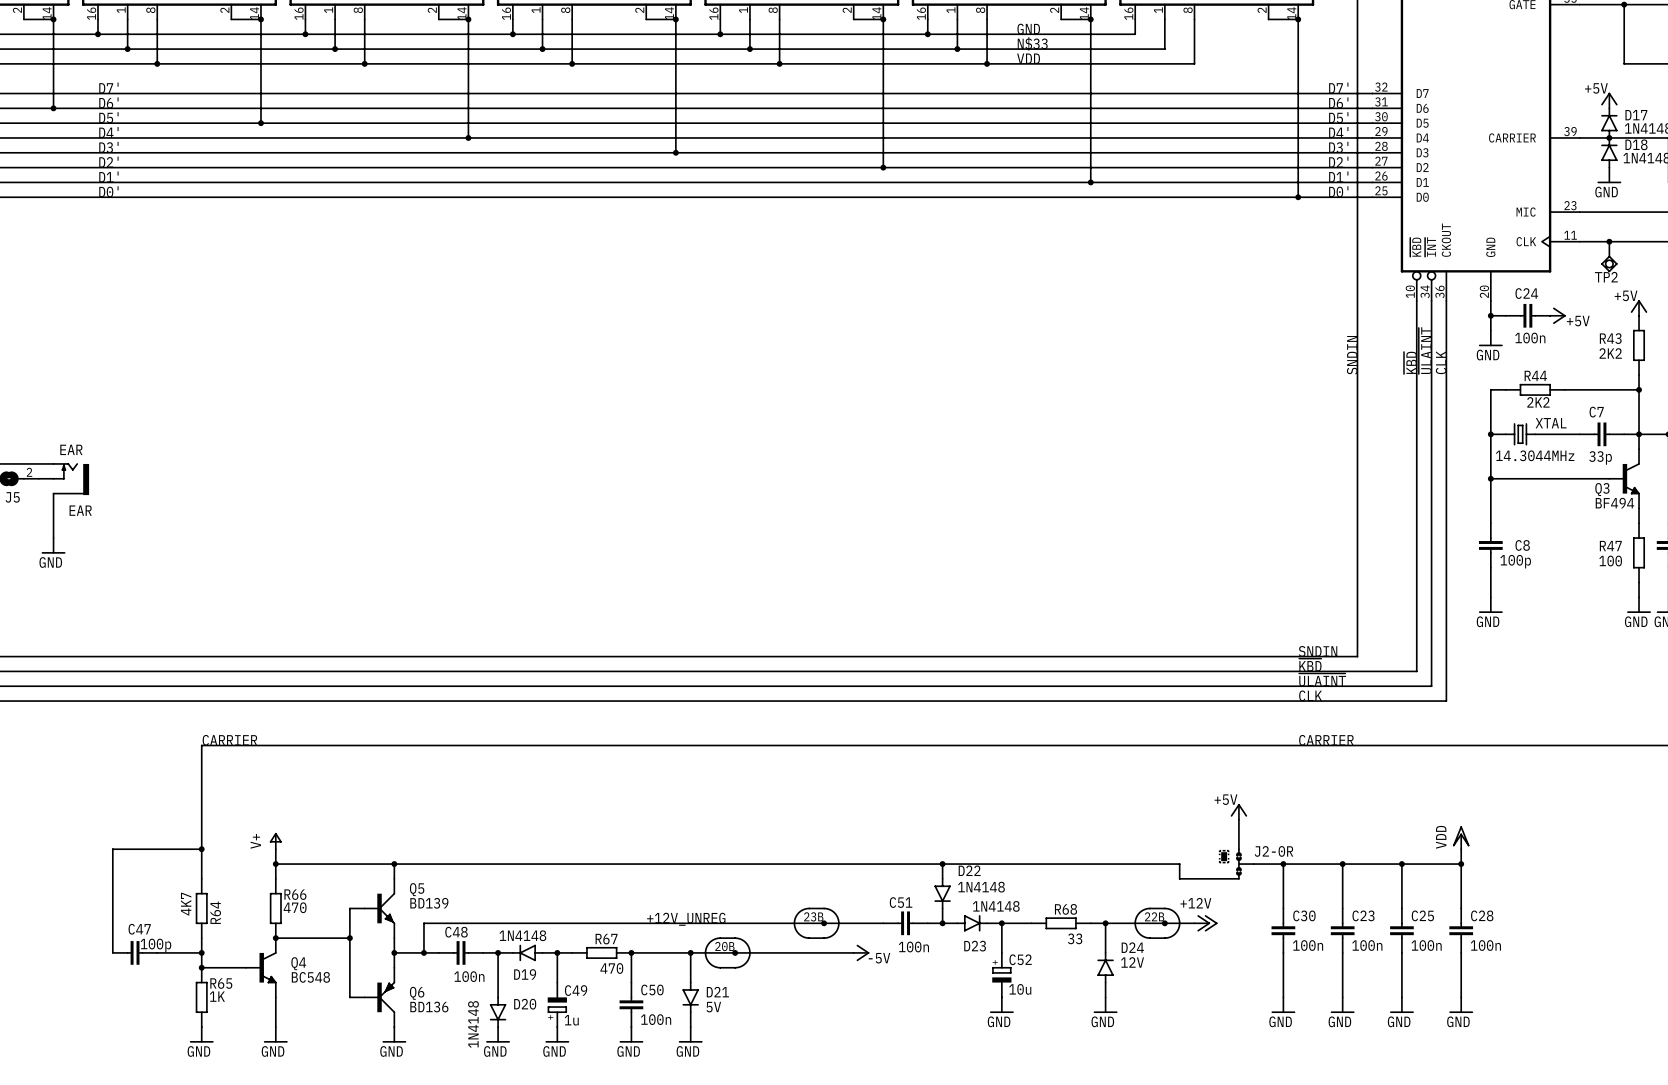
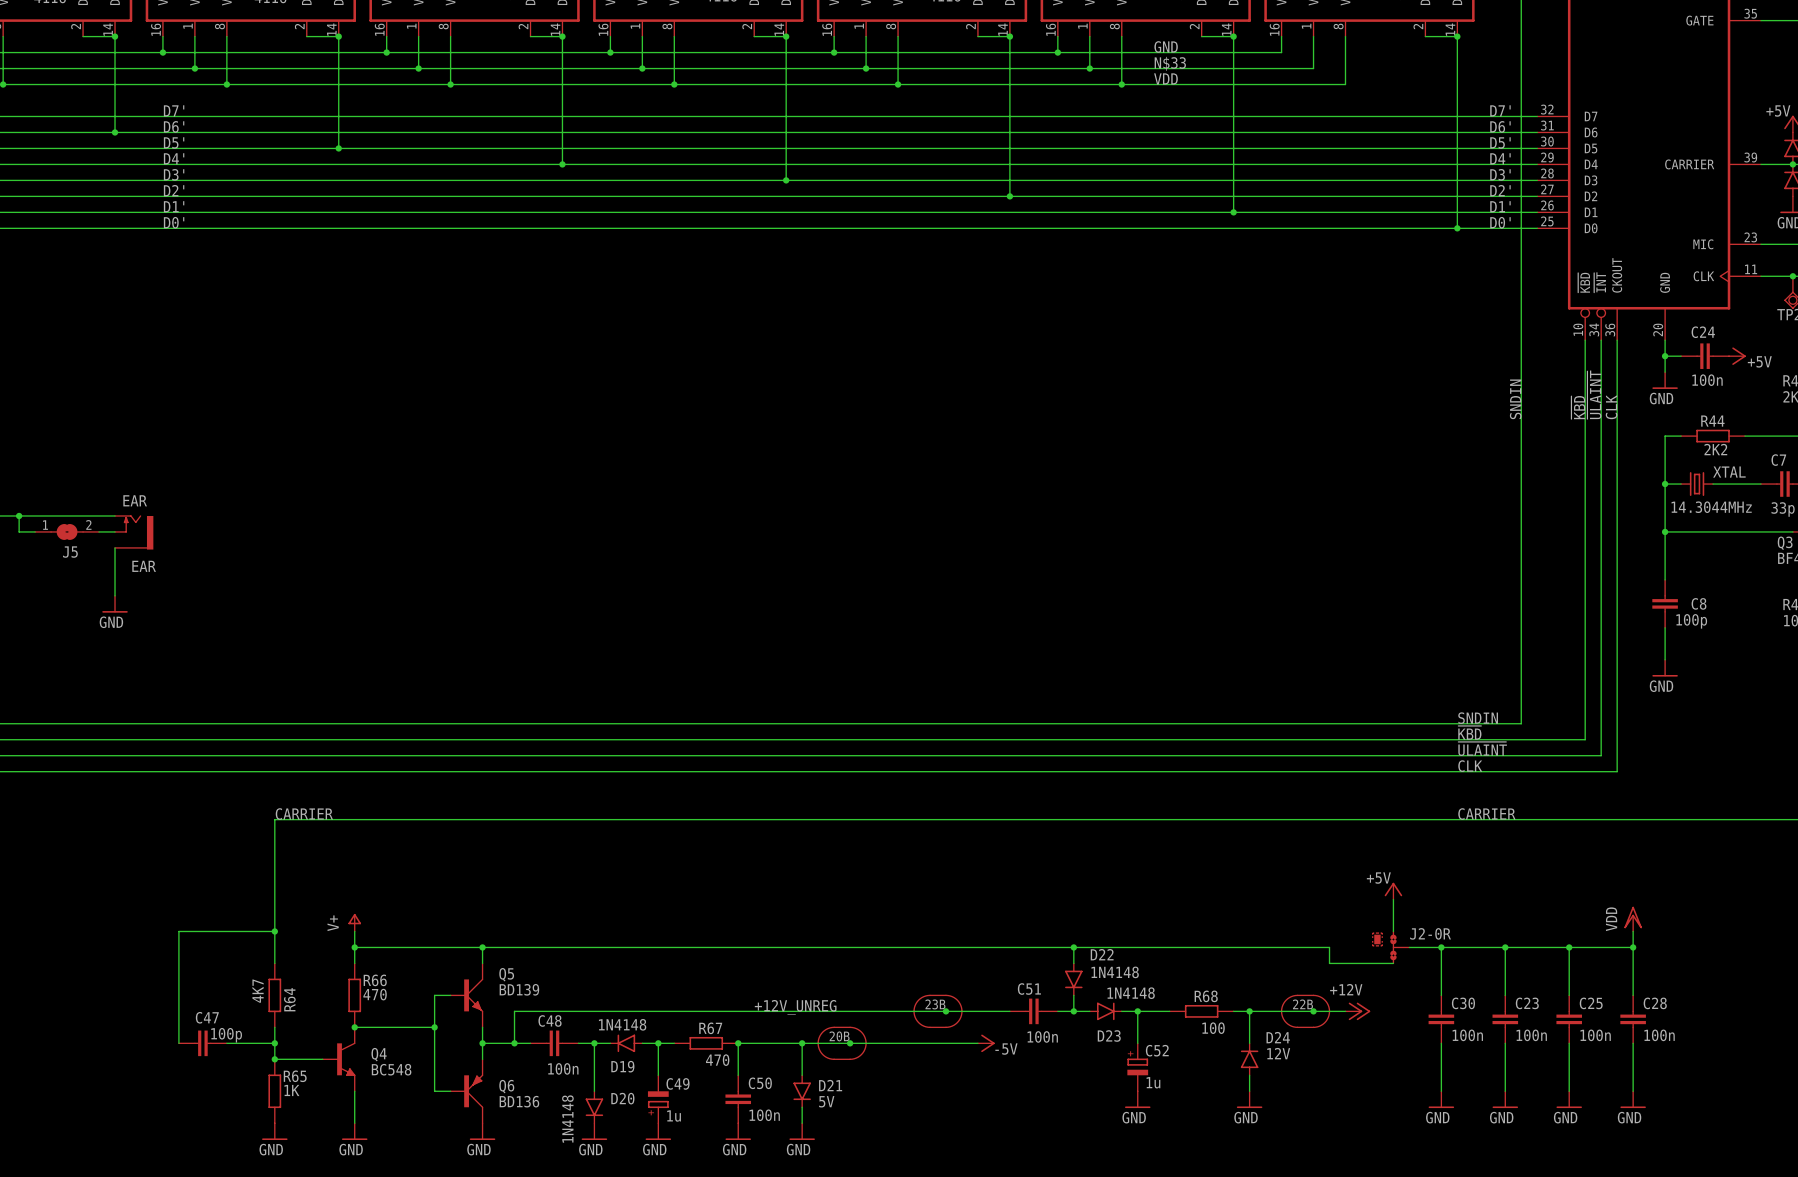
R68 value: 33 (1075, 938) -> 100 (1213, 1028)
C52 value: 10u (1020, 989) -> 1u (1153, 1082)

